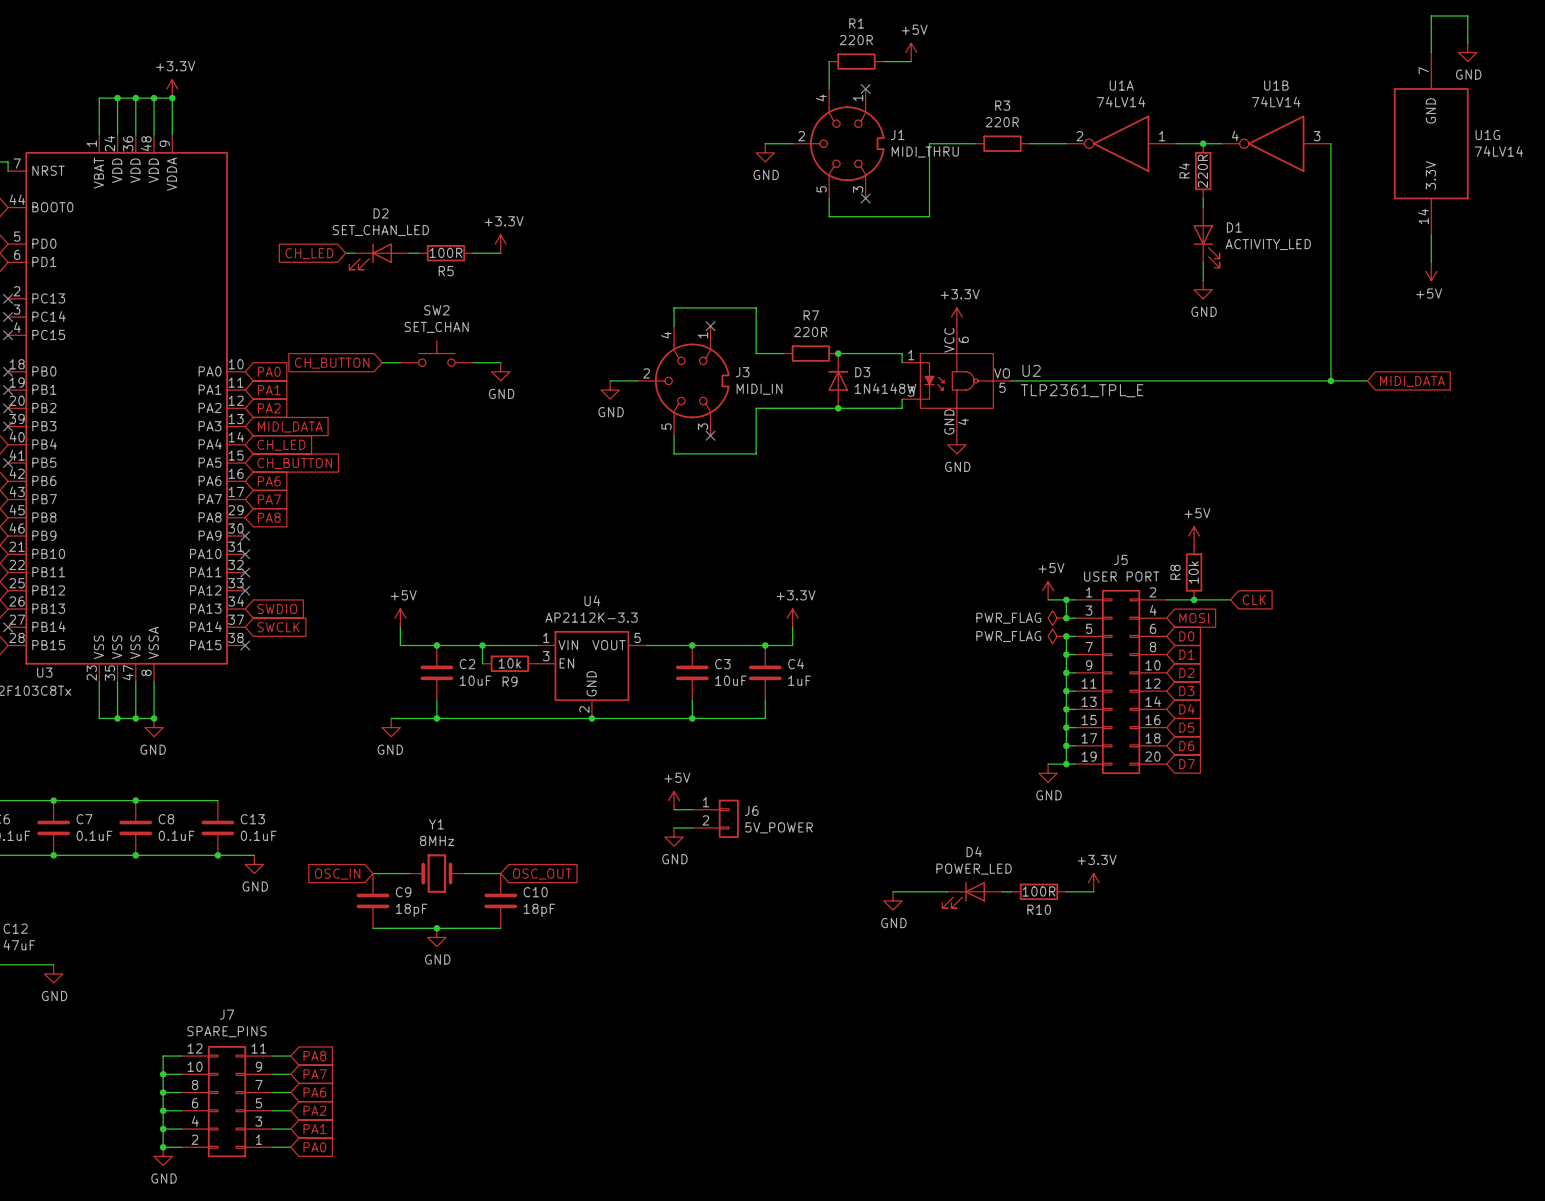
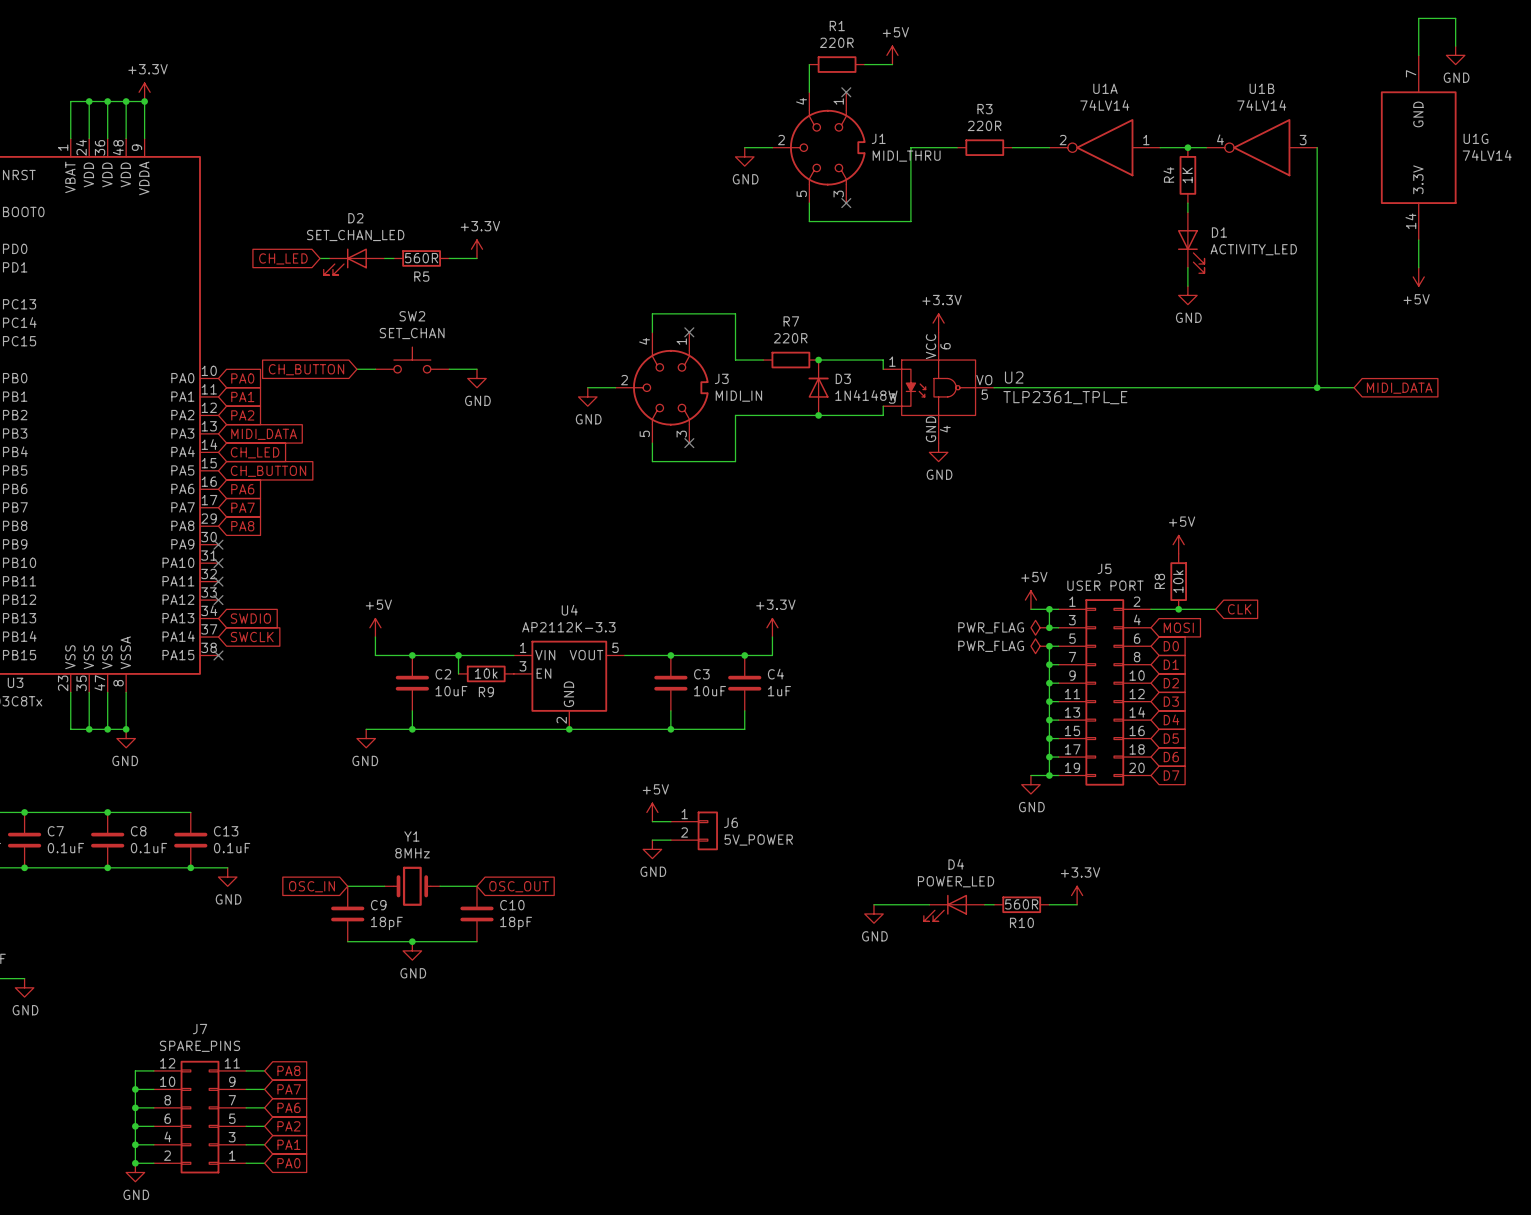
R4 value: 220R (1202, 171) -> 1K (1187, 175)
R5 value: 100R (445, 252) -> 560R (421, 258)
R10 value: 100R (1038, 891) -> 560R (1021, 904)

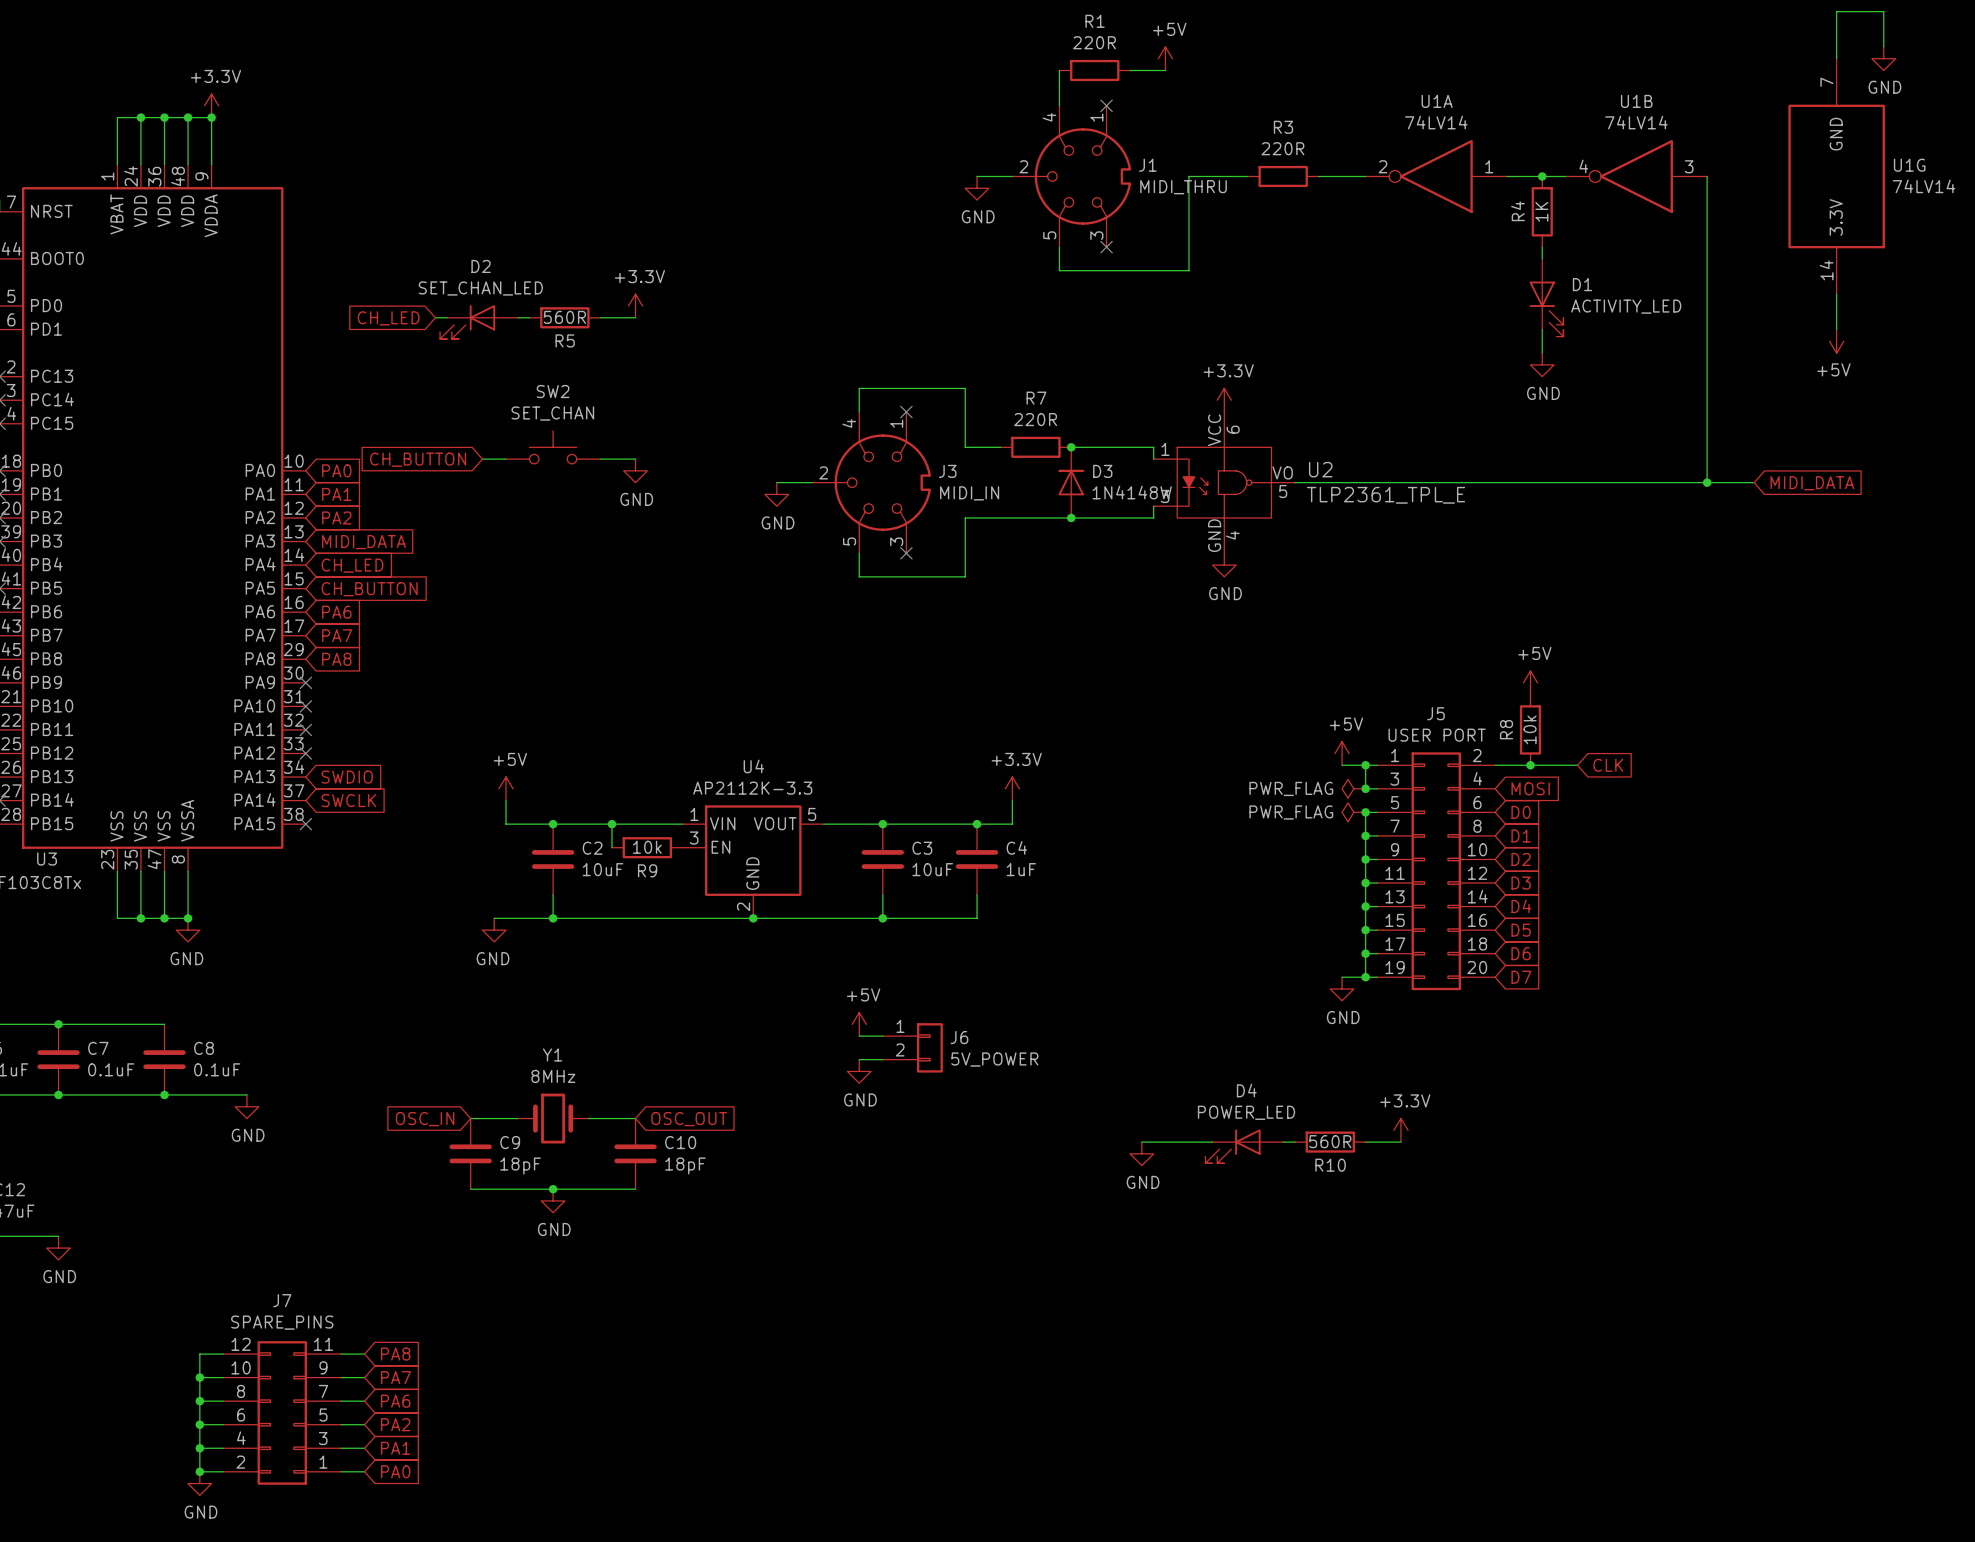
wire: (107, 812) (190, 812) -> none
junction: (107, 812) -> none
C13: 0.1uF (190, 840) -> none
wire: (172, 867) (227, 867) -> none
junction: (190, 867) -> none
power symbol position: GND (227, 877) -> GND (246, 1106)

